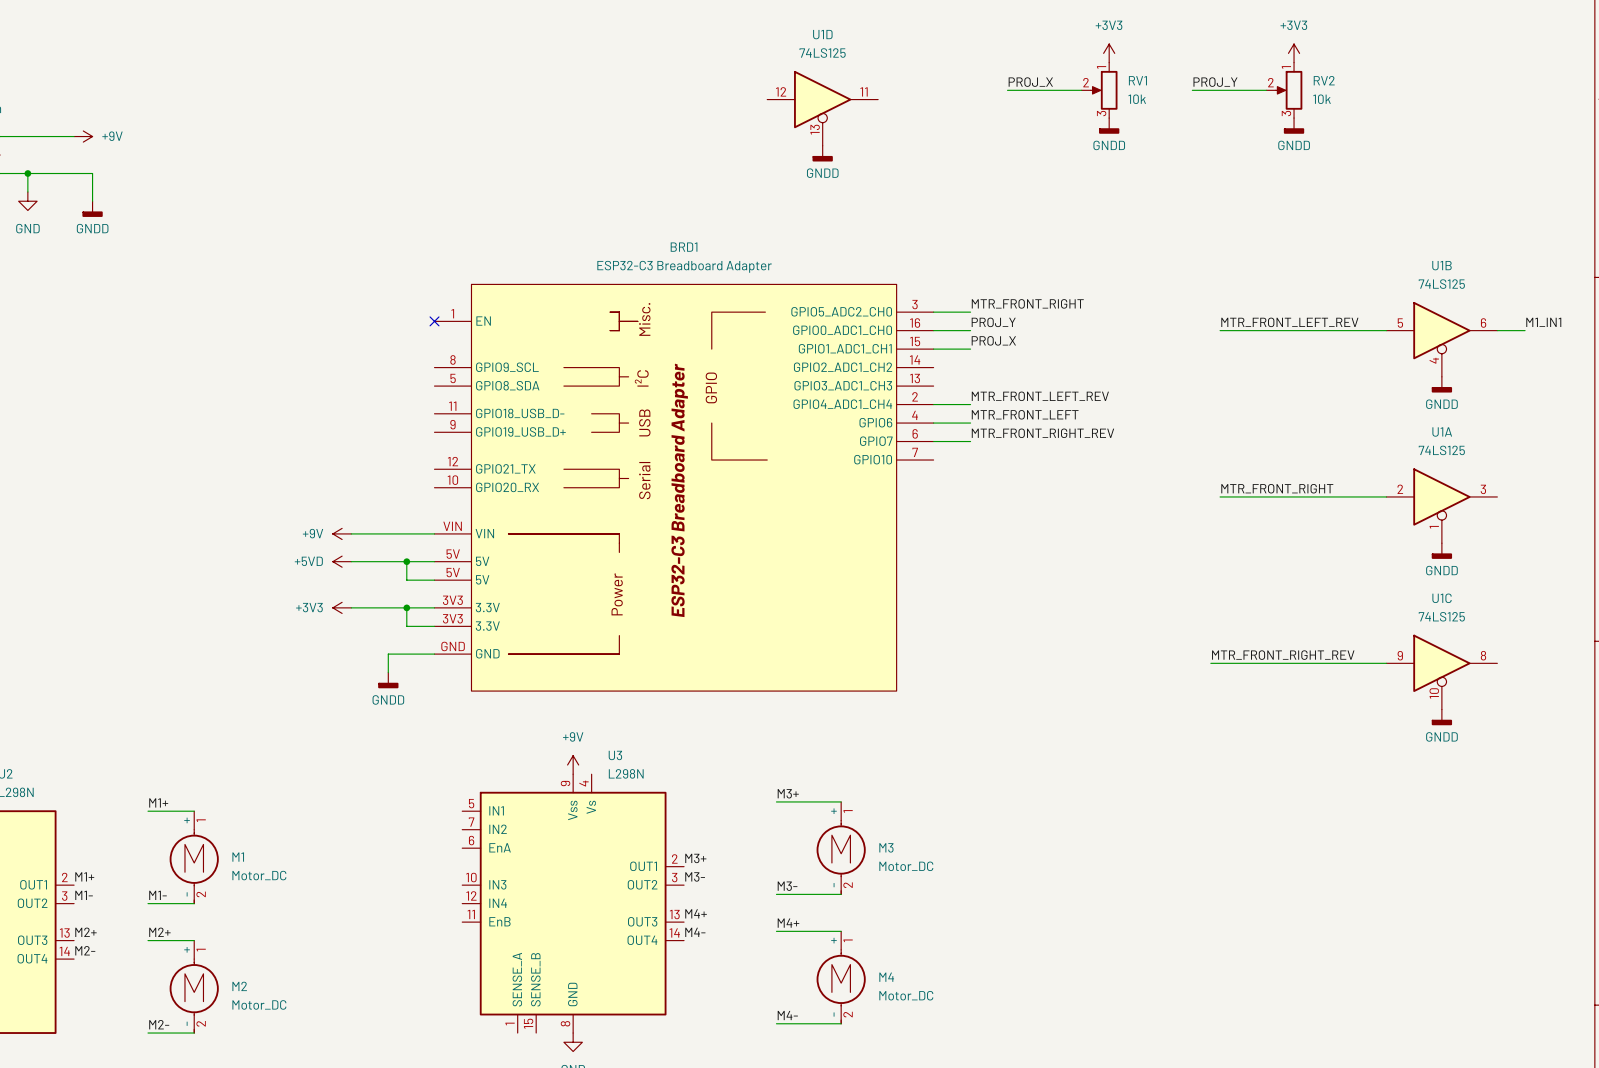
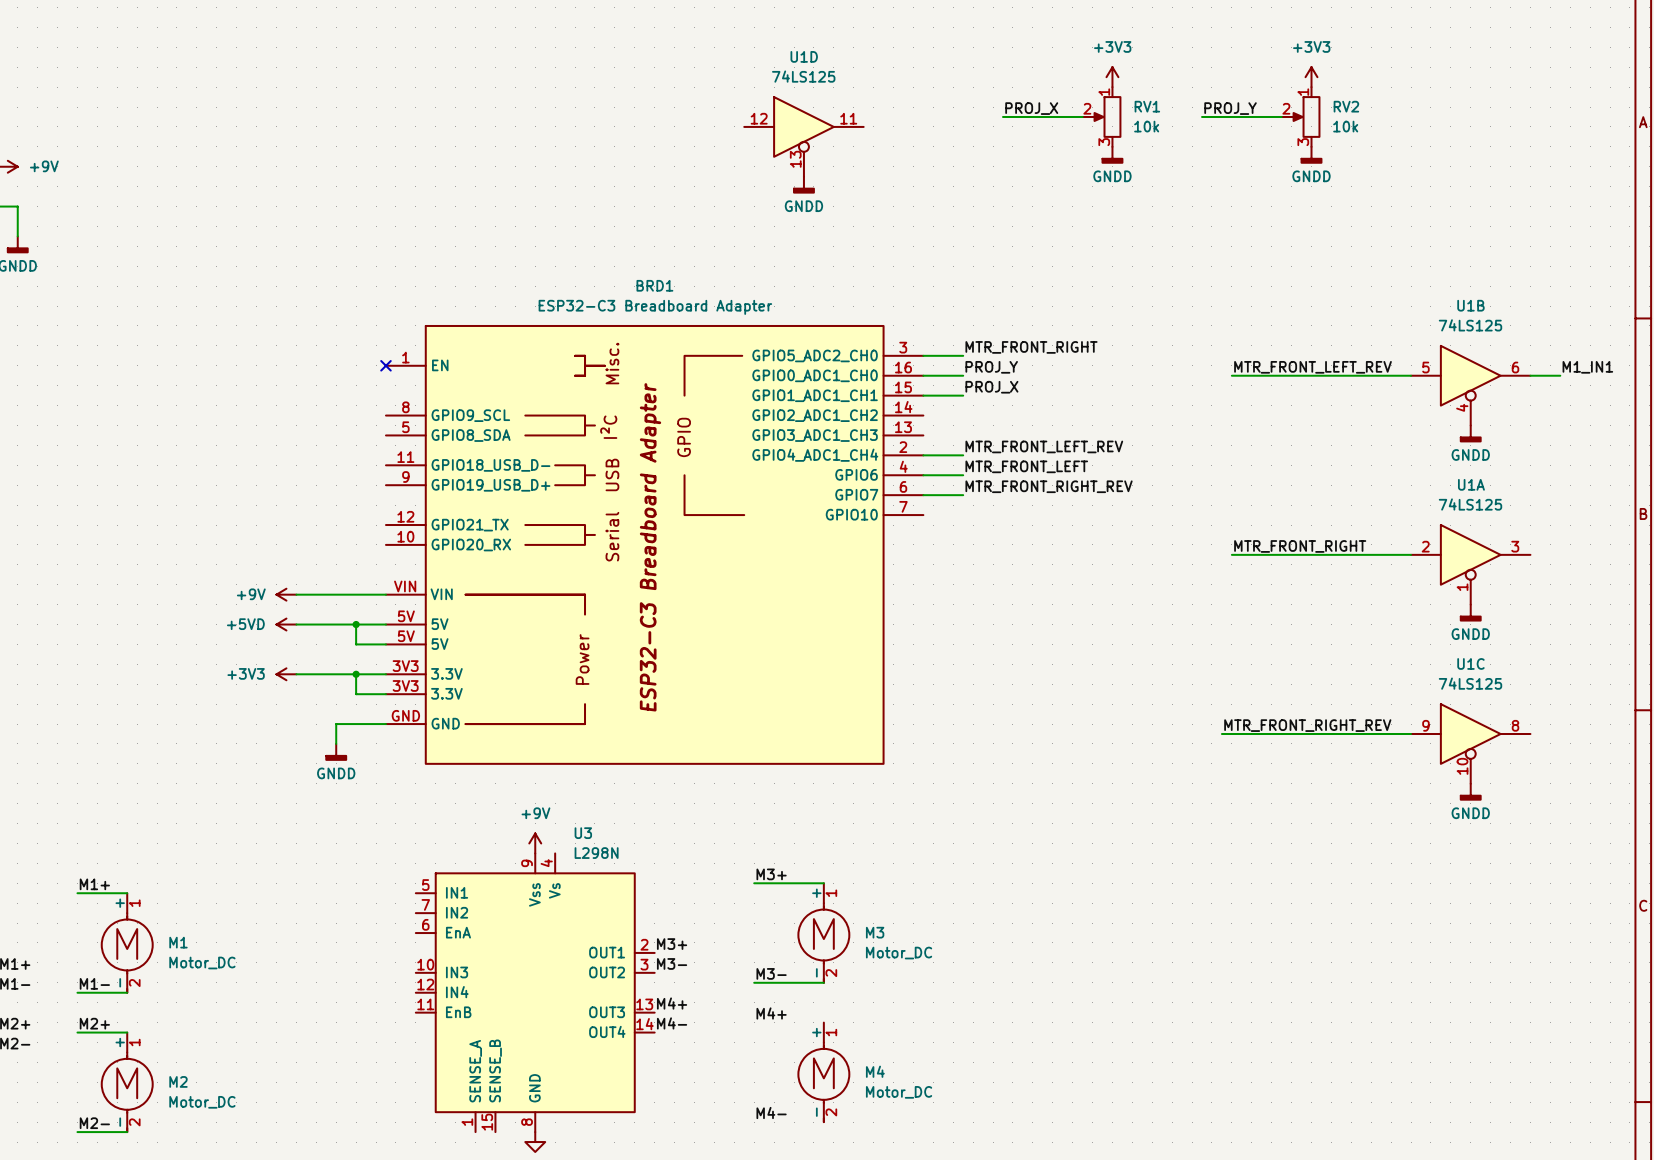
wire: (776, 931) (841, 931) -> none
wire: (776, 1023) (841, 1023) -> none

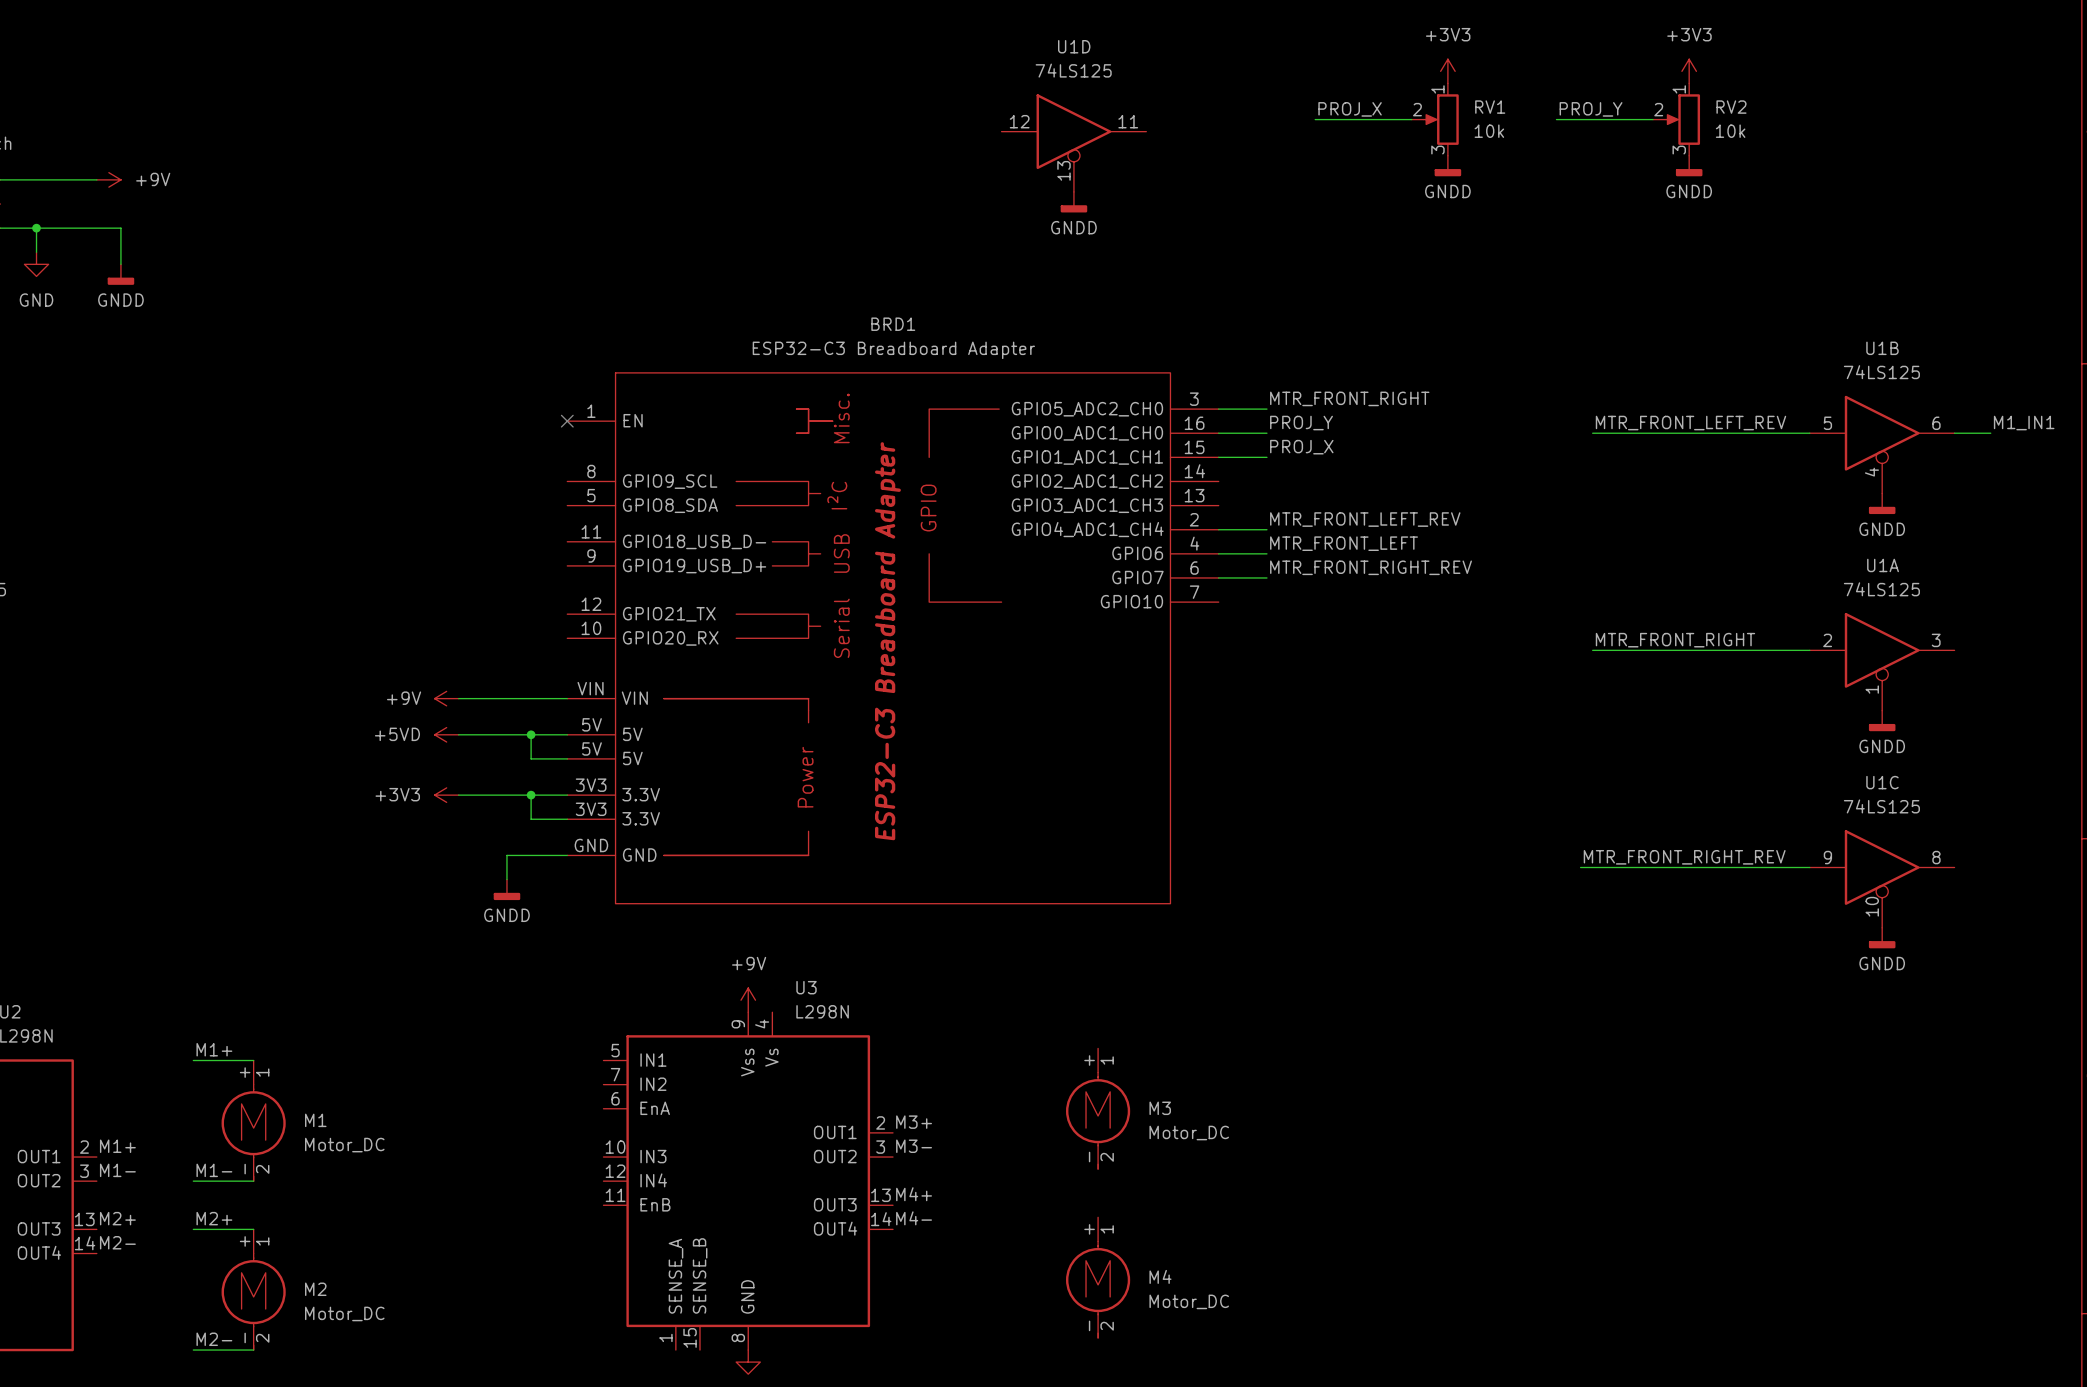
label: M3+ (771, 874) -> none
wire: (754, 883) (823, 883) -> none
label: M3- (771, 973) -> none
wire: (754, 982) (823, 982) -> none
label: M4+ (771, 1013) -> none
label: M4- (771, 1113) -> none

